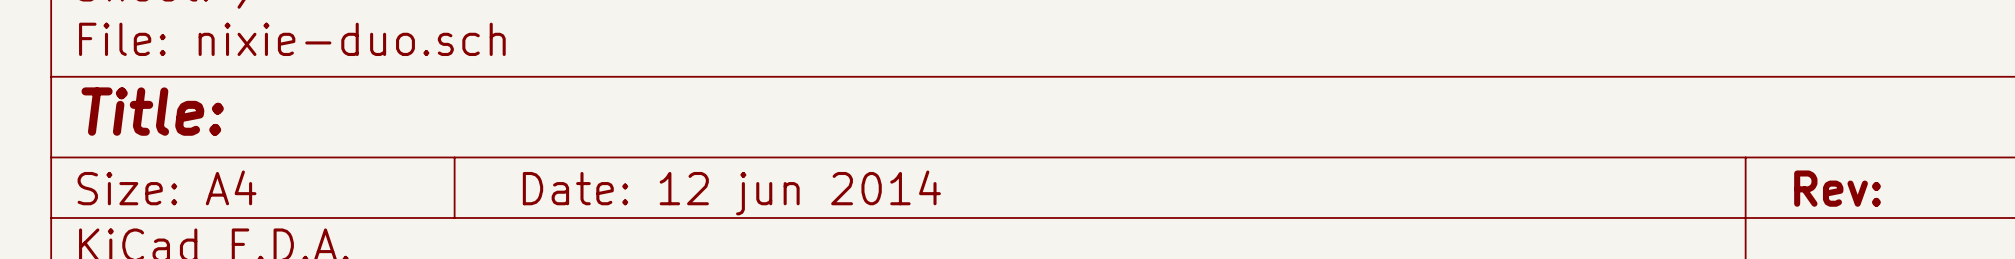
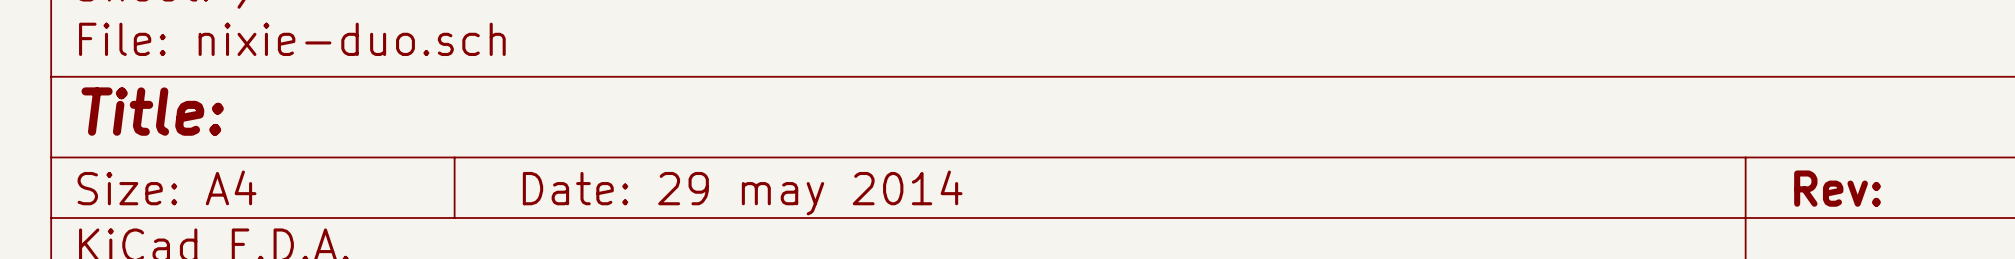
title block: Date: 12 jun 2014 (731, 192) -> Date: 29 may 2014 (742, 192)

